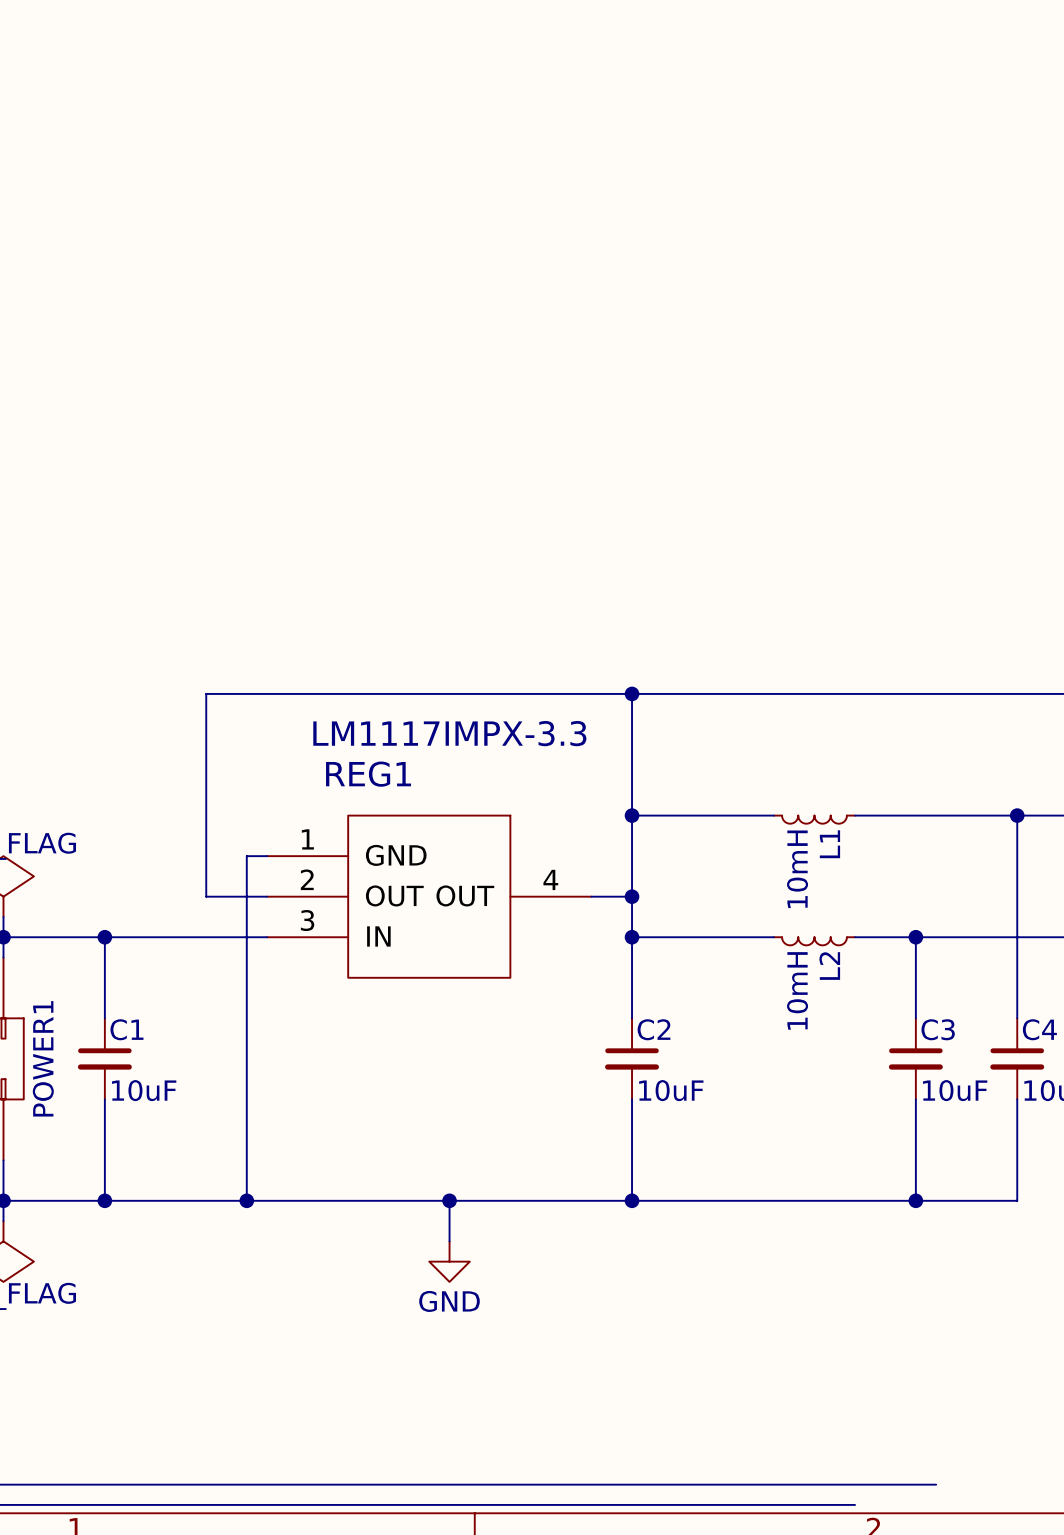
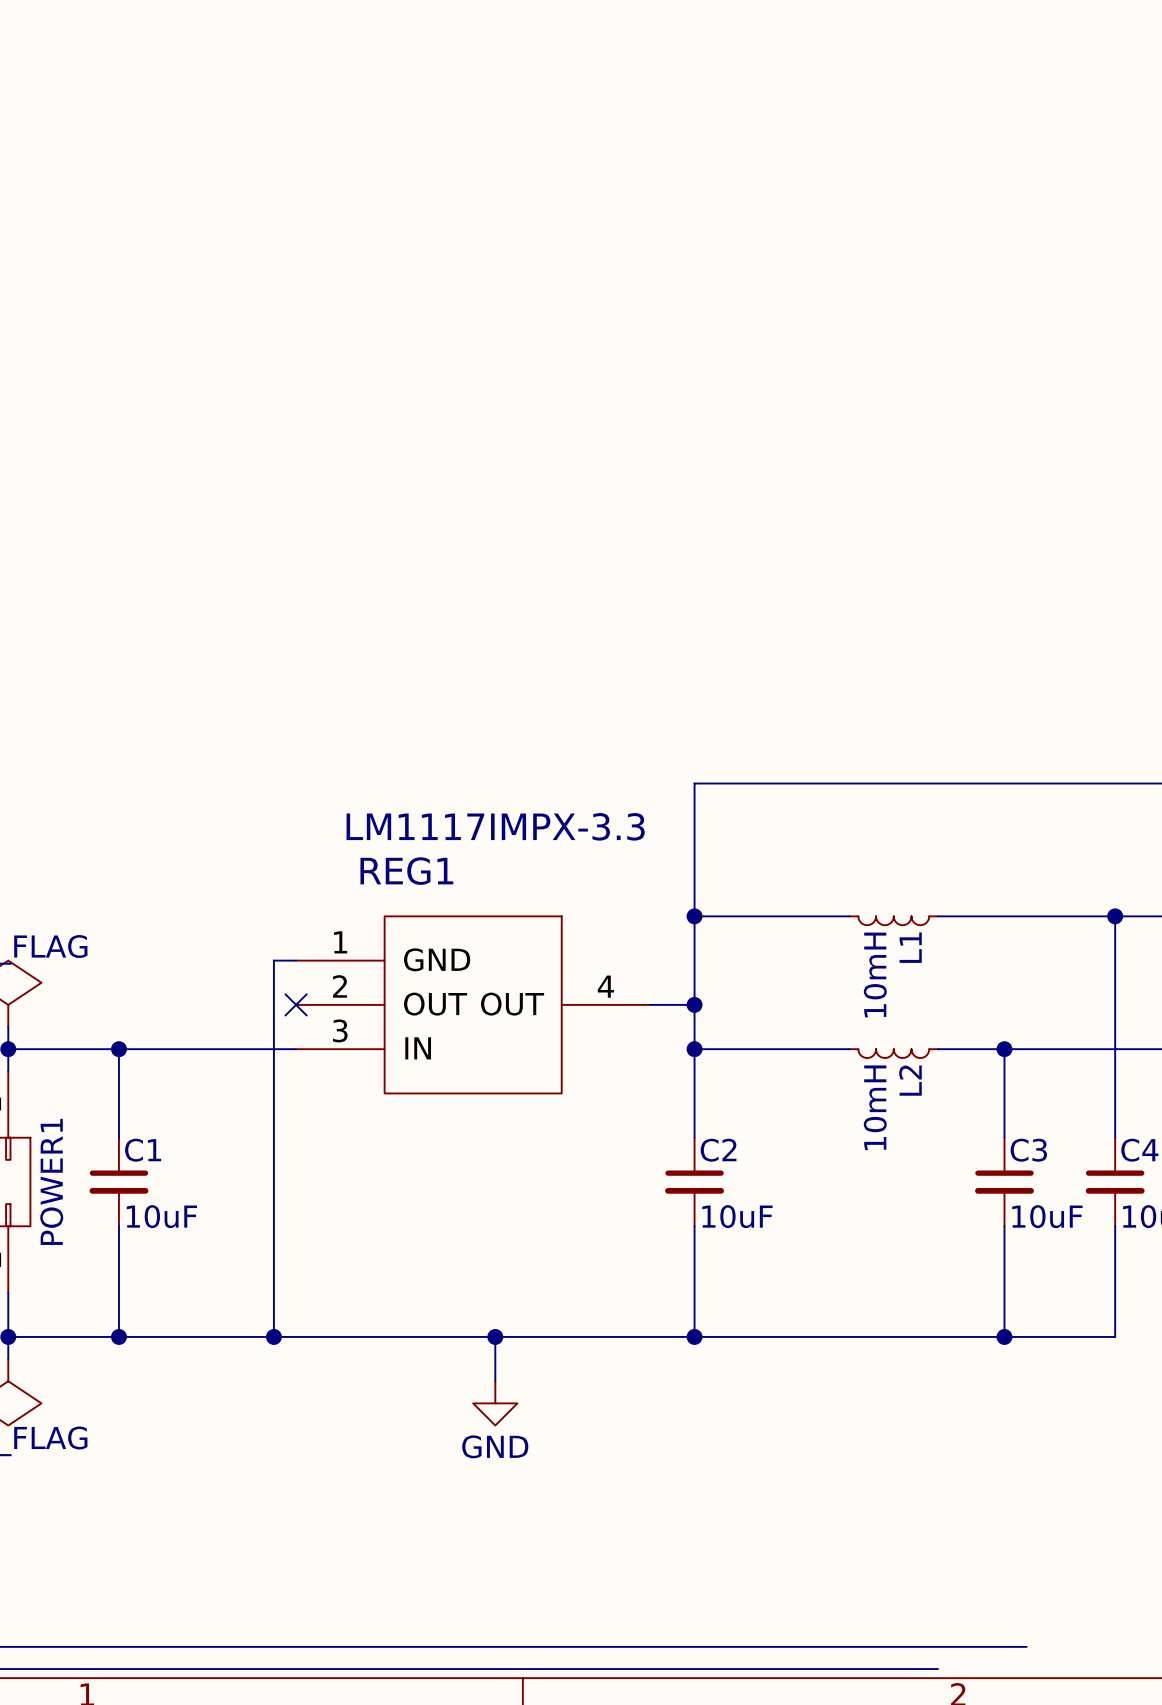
wire: (632, 693) (206, 693) (206, 896) (267, 896) -> none
junction: (632, 693) -> none
no-connect mark: none -> (296, 1004)

